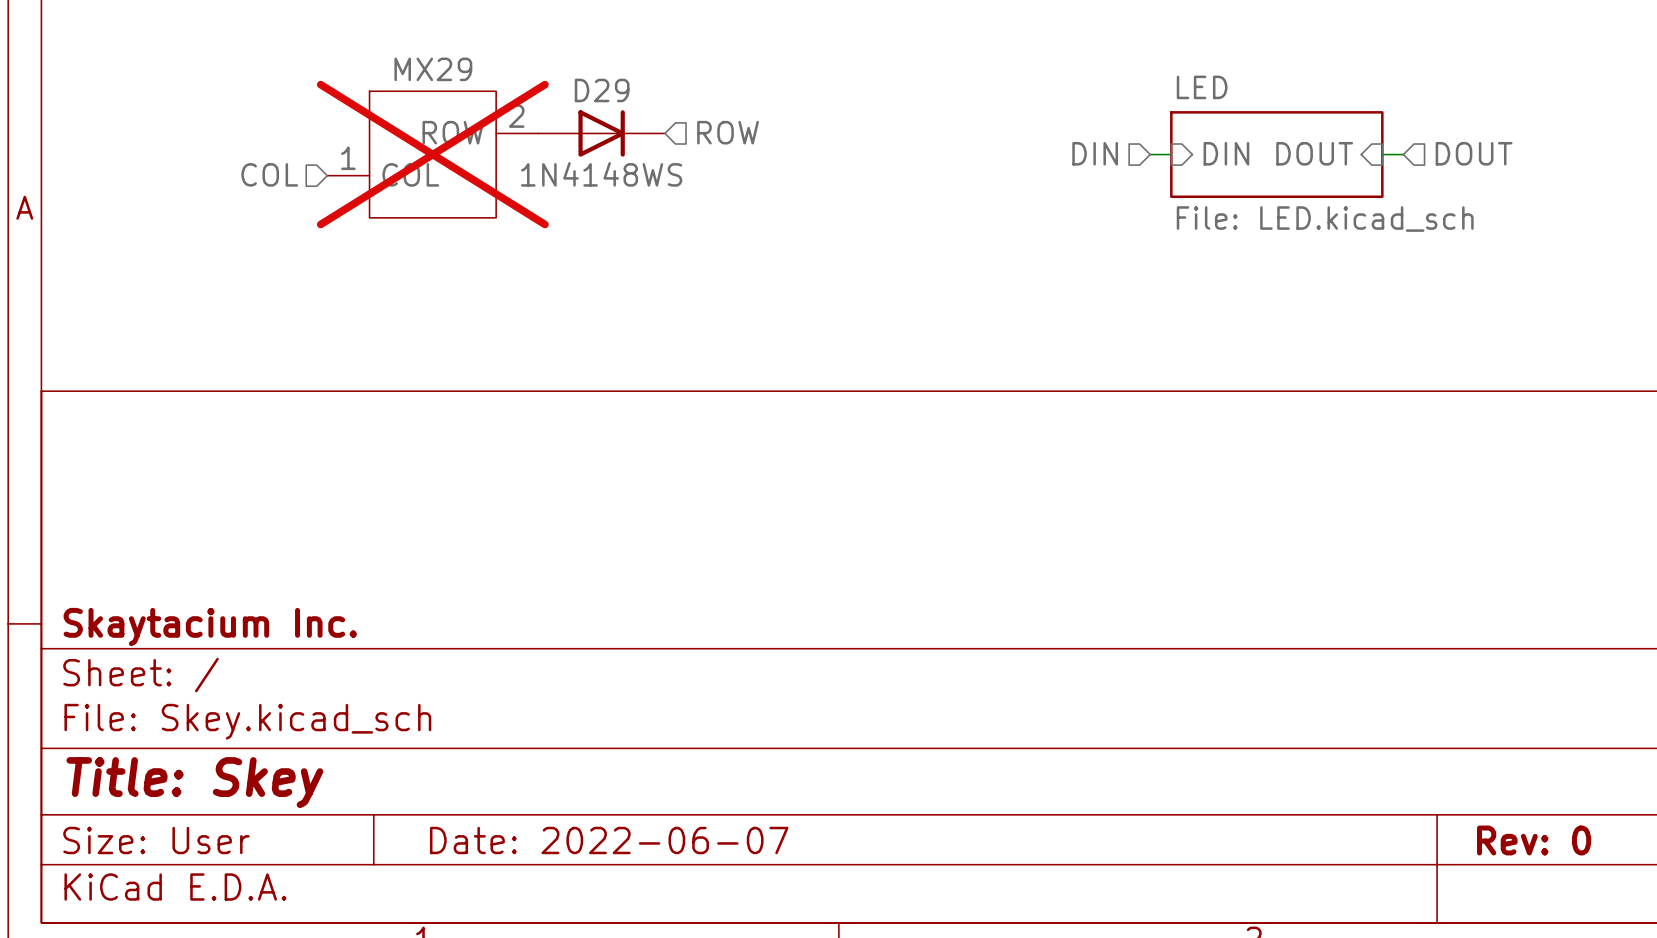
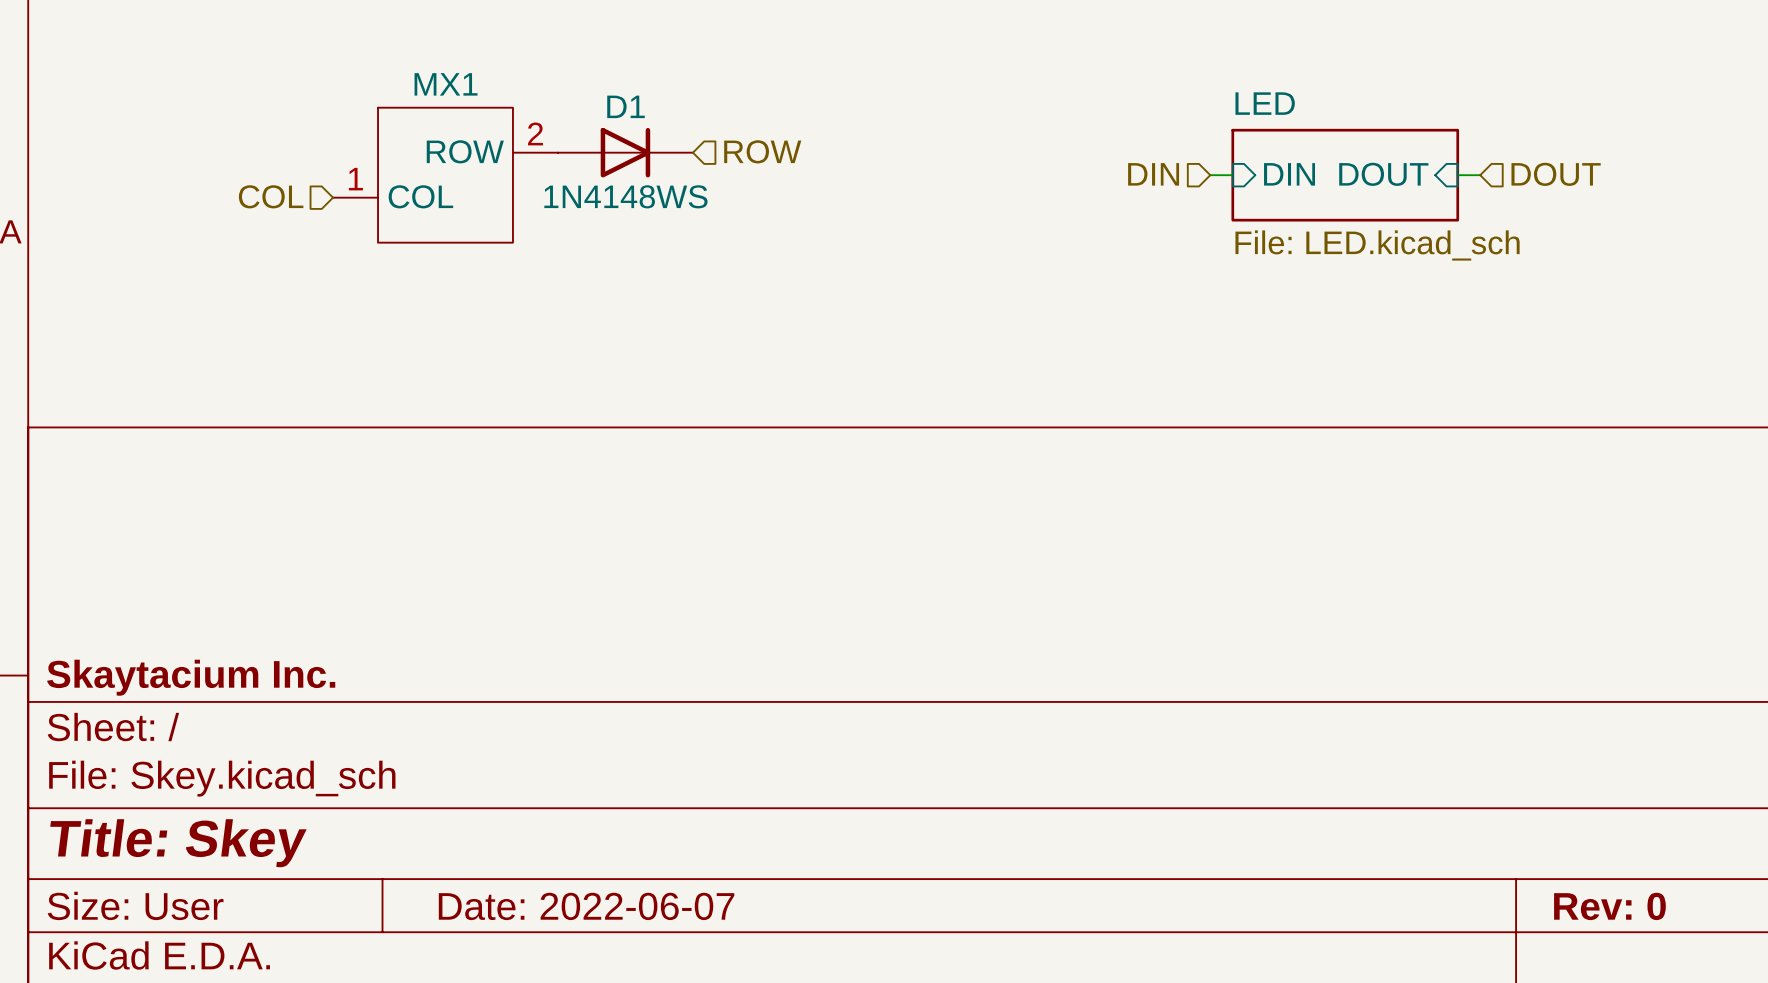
MX29 name: MX29 (433, 69) -> MX1 (446, 84)
D29 name: D29 (602, 90) -> D1 (625, 106)
MX29 do-not-place cross: (432, 154) -> none

